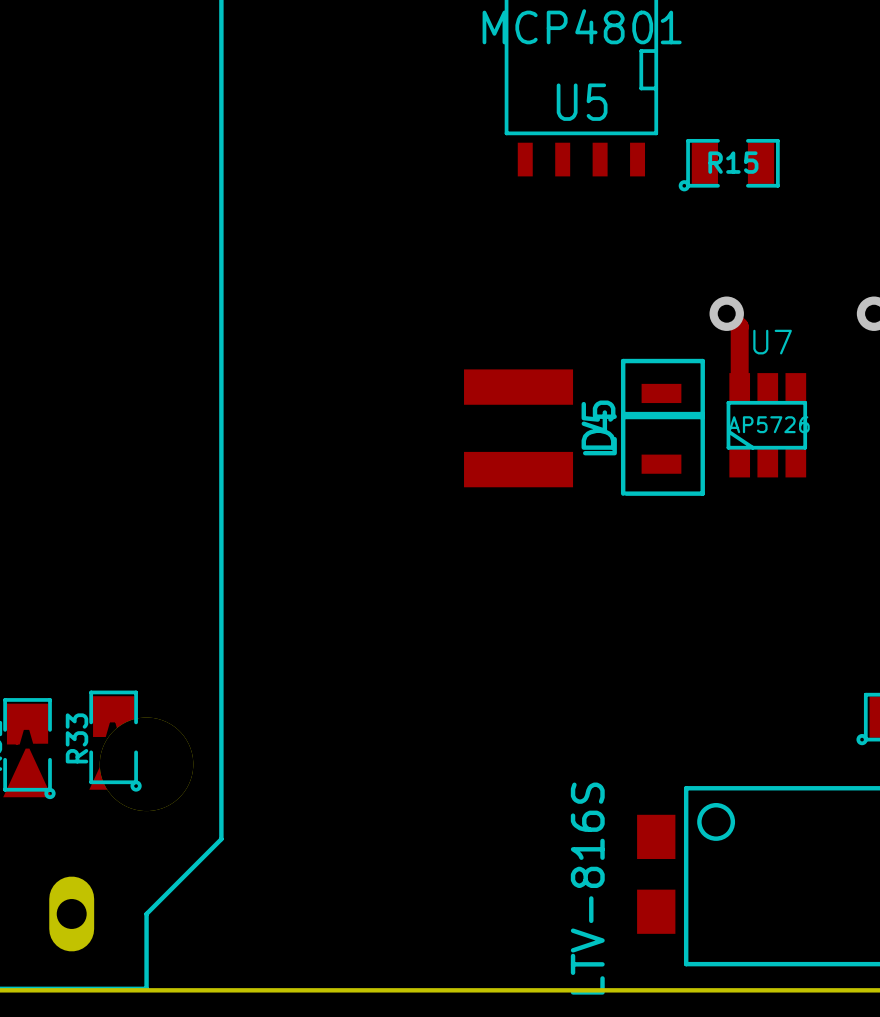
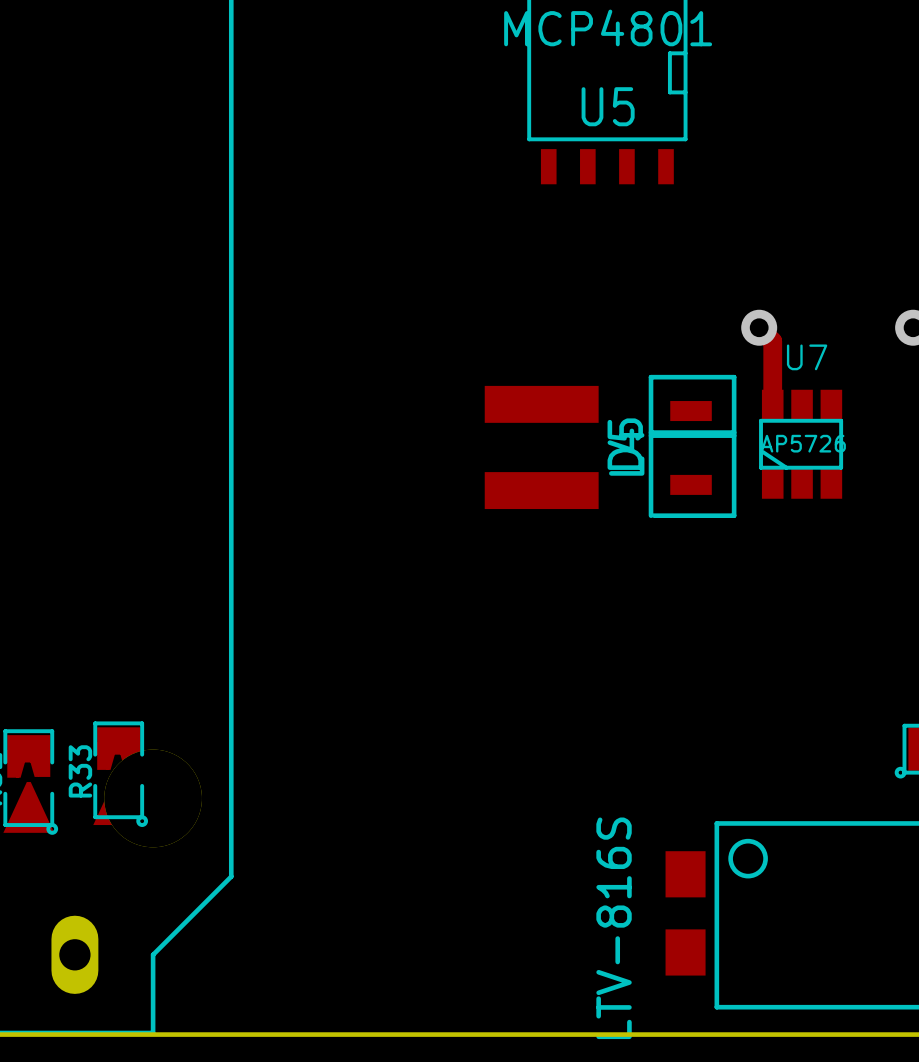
R15: (729, 165) -> none

